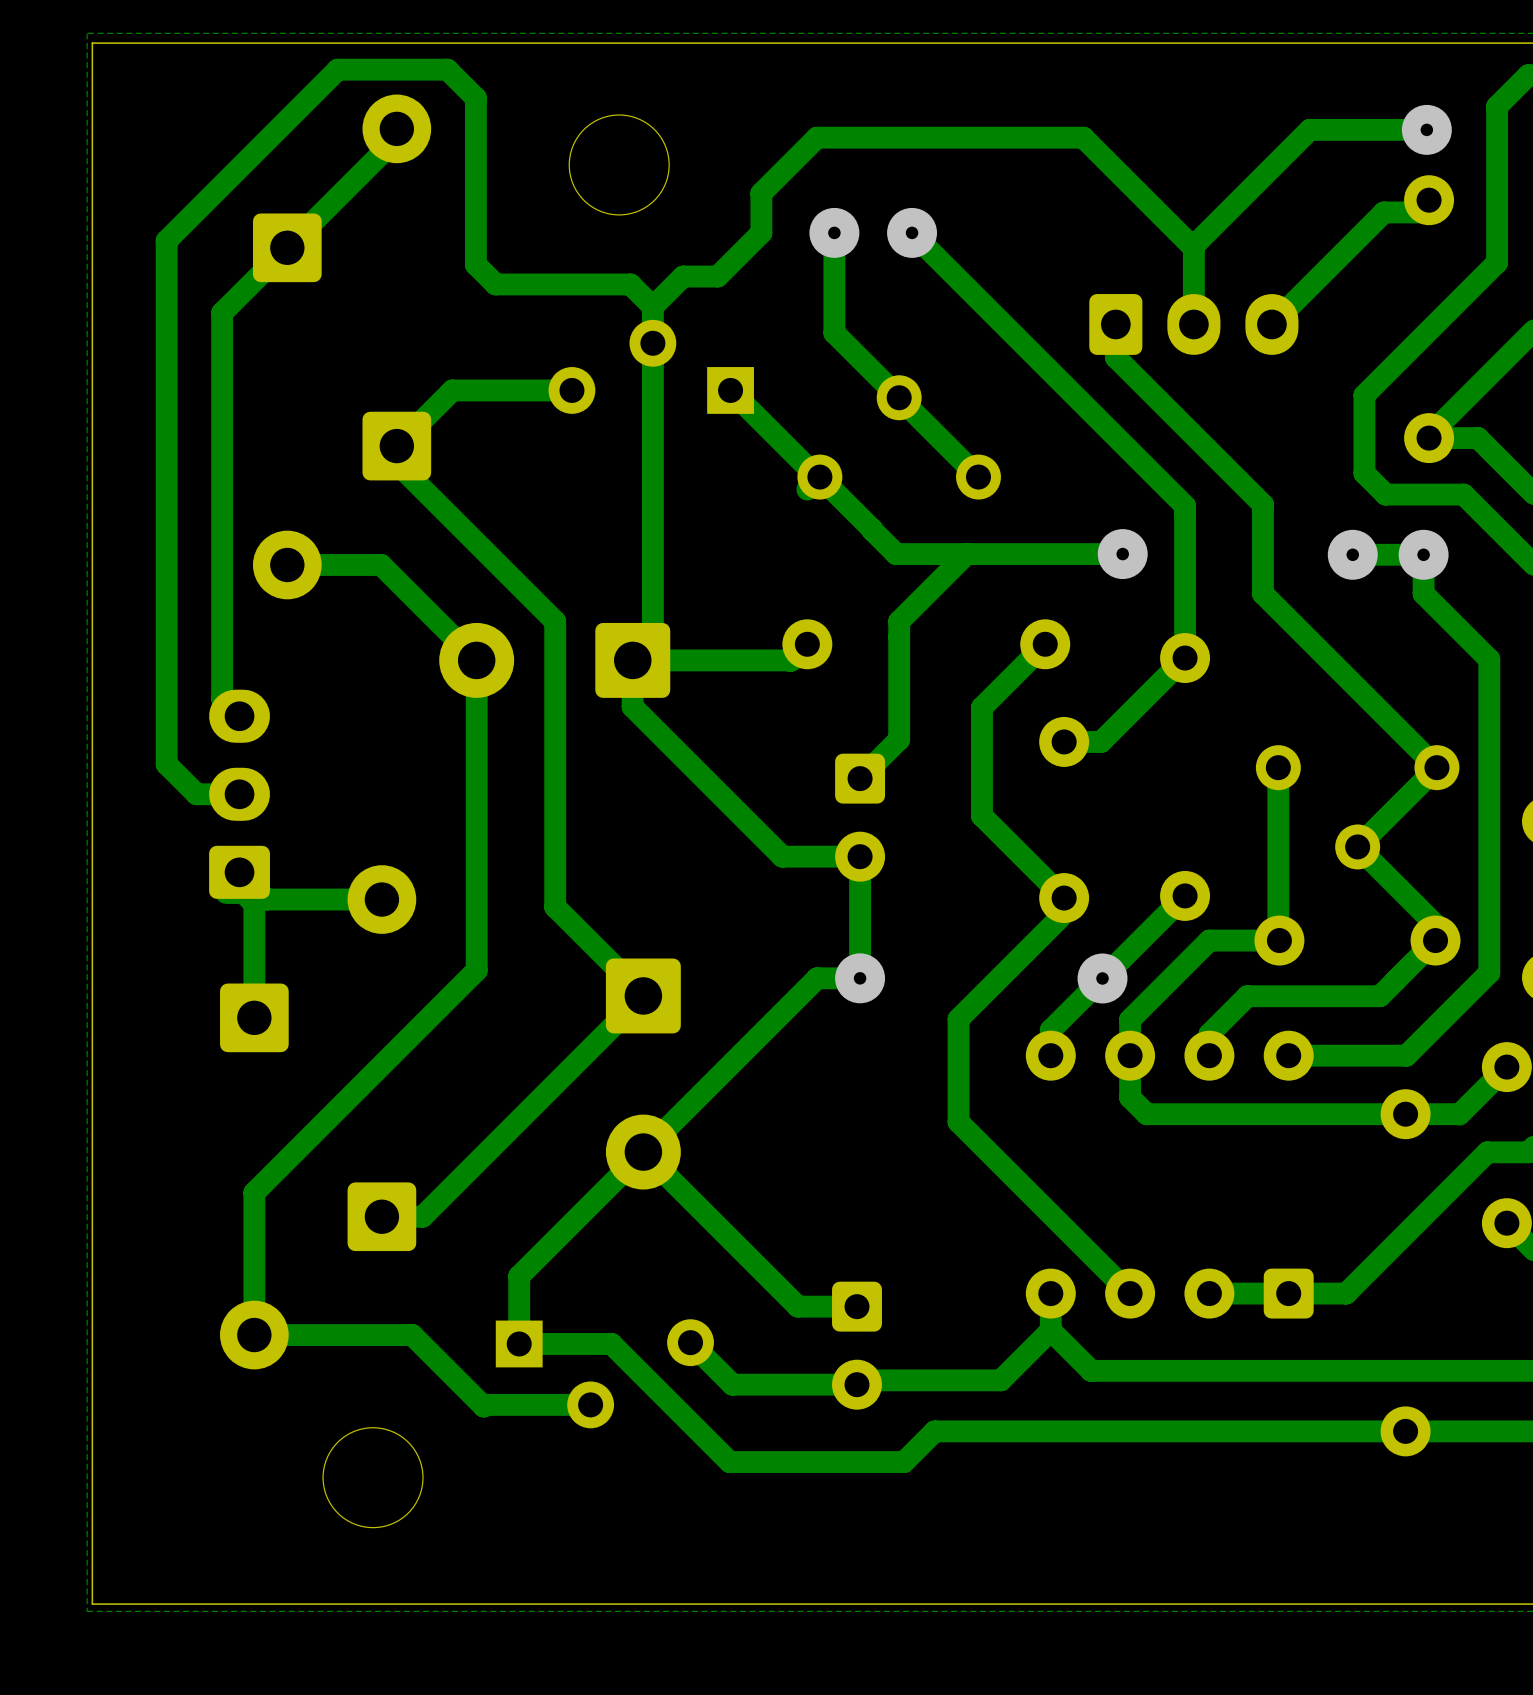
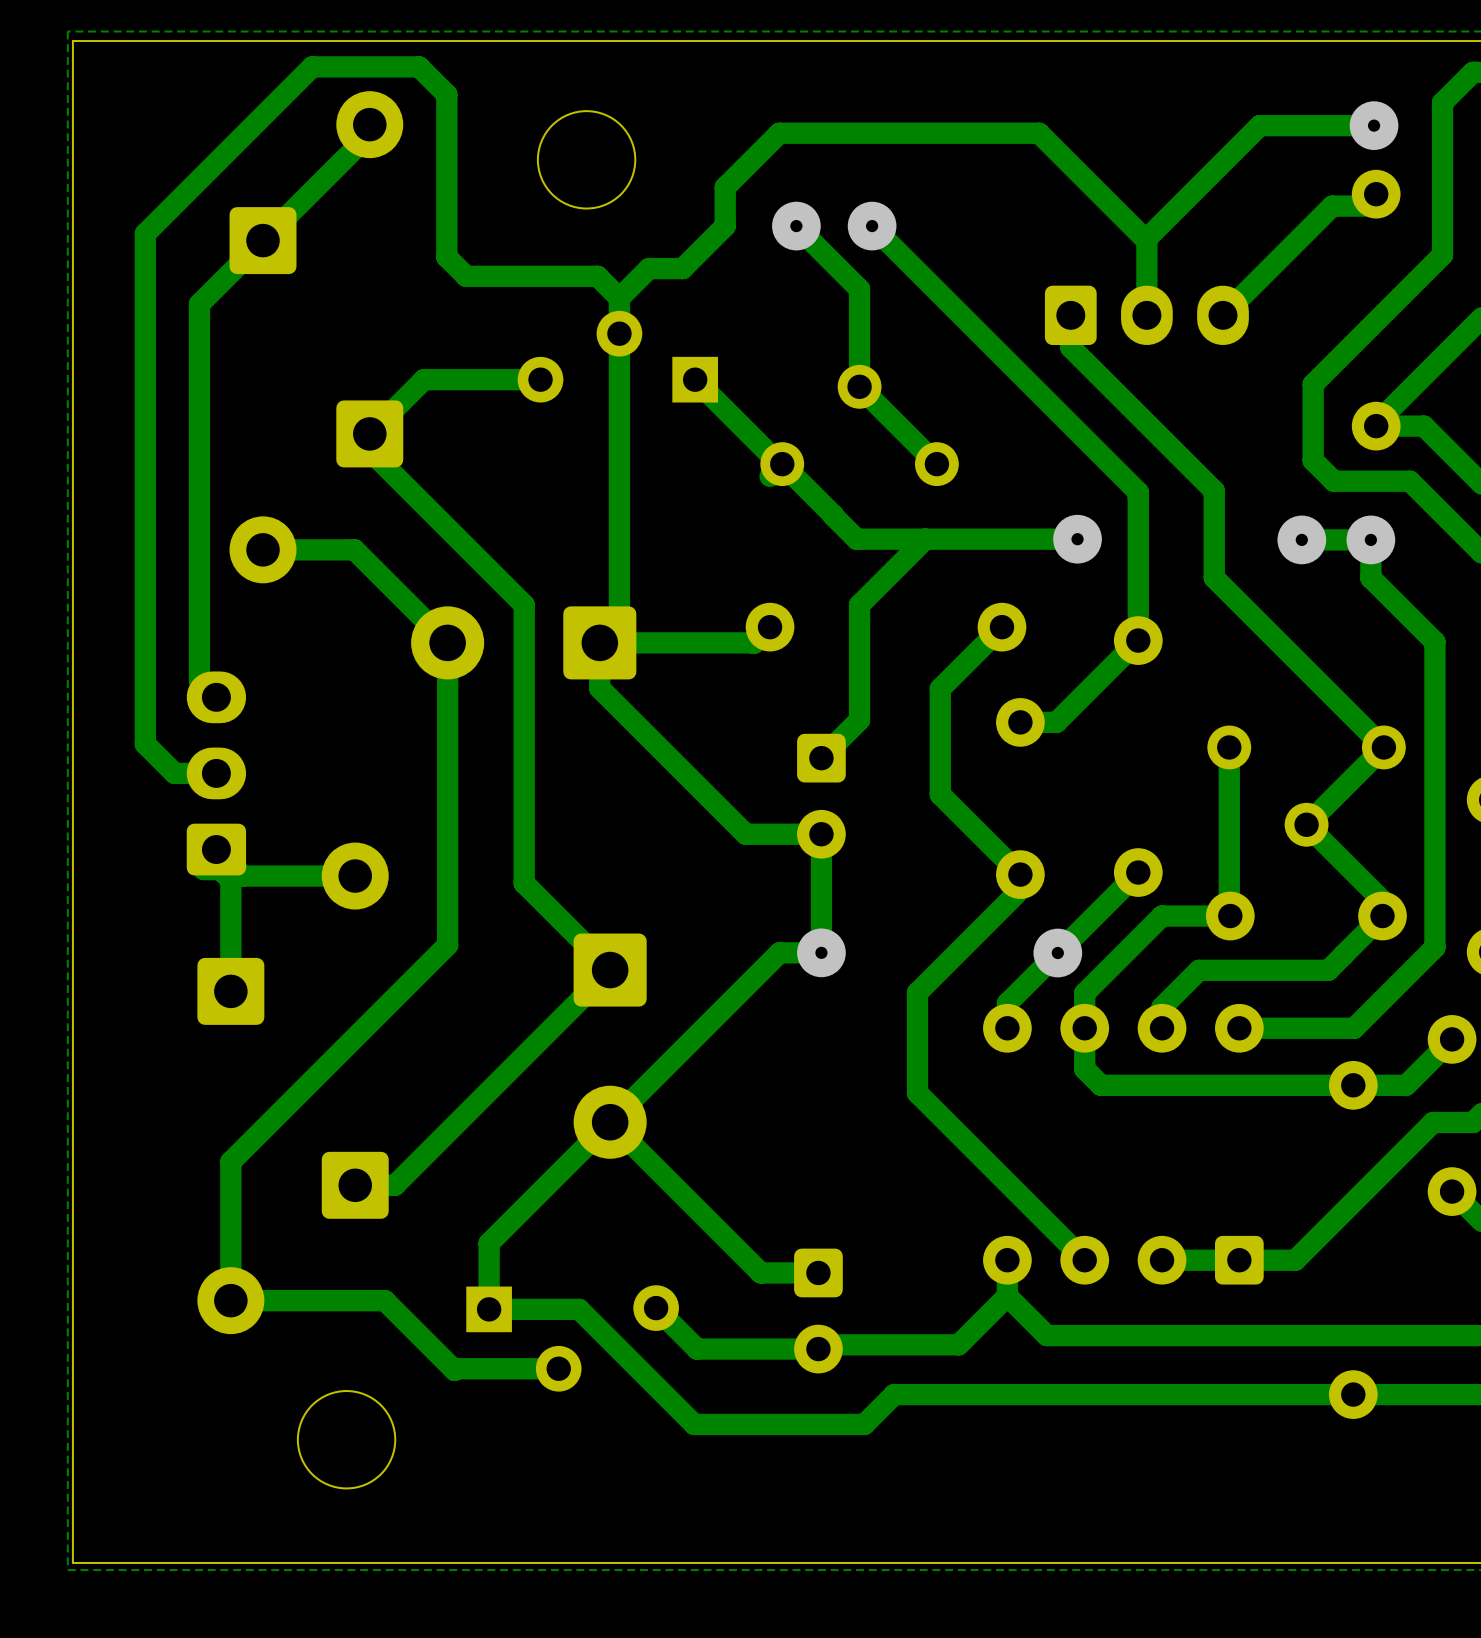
track: (834, 232) (834, 332) (899, 397) -> (796, 226) (859, 289) (859, 386)

